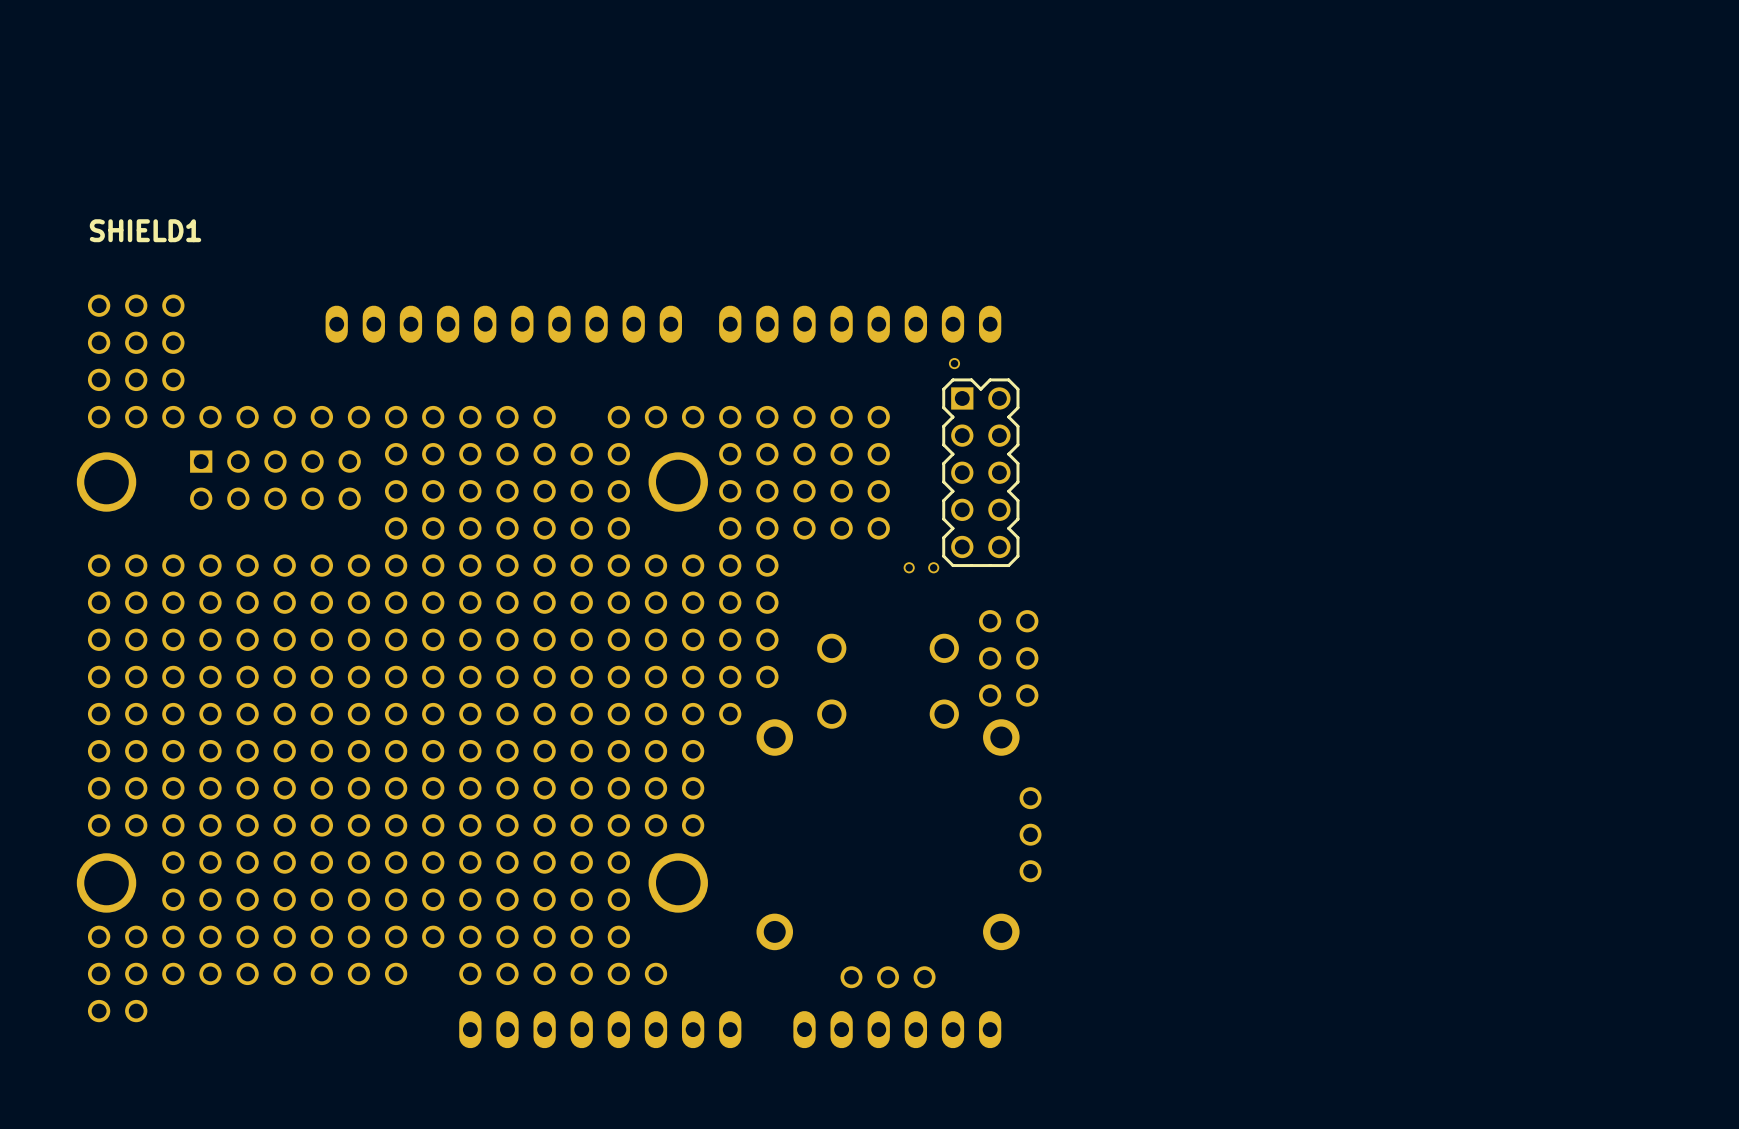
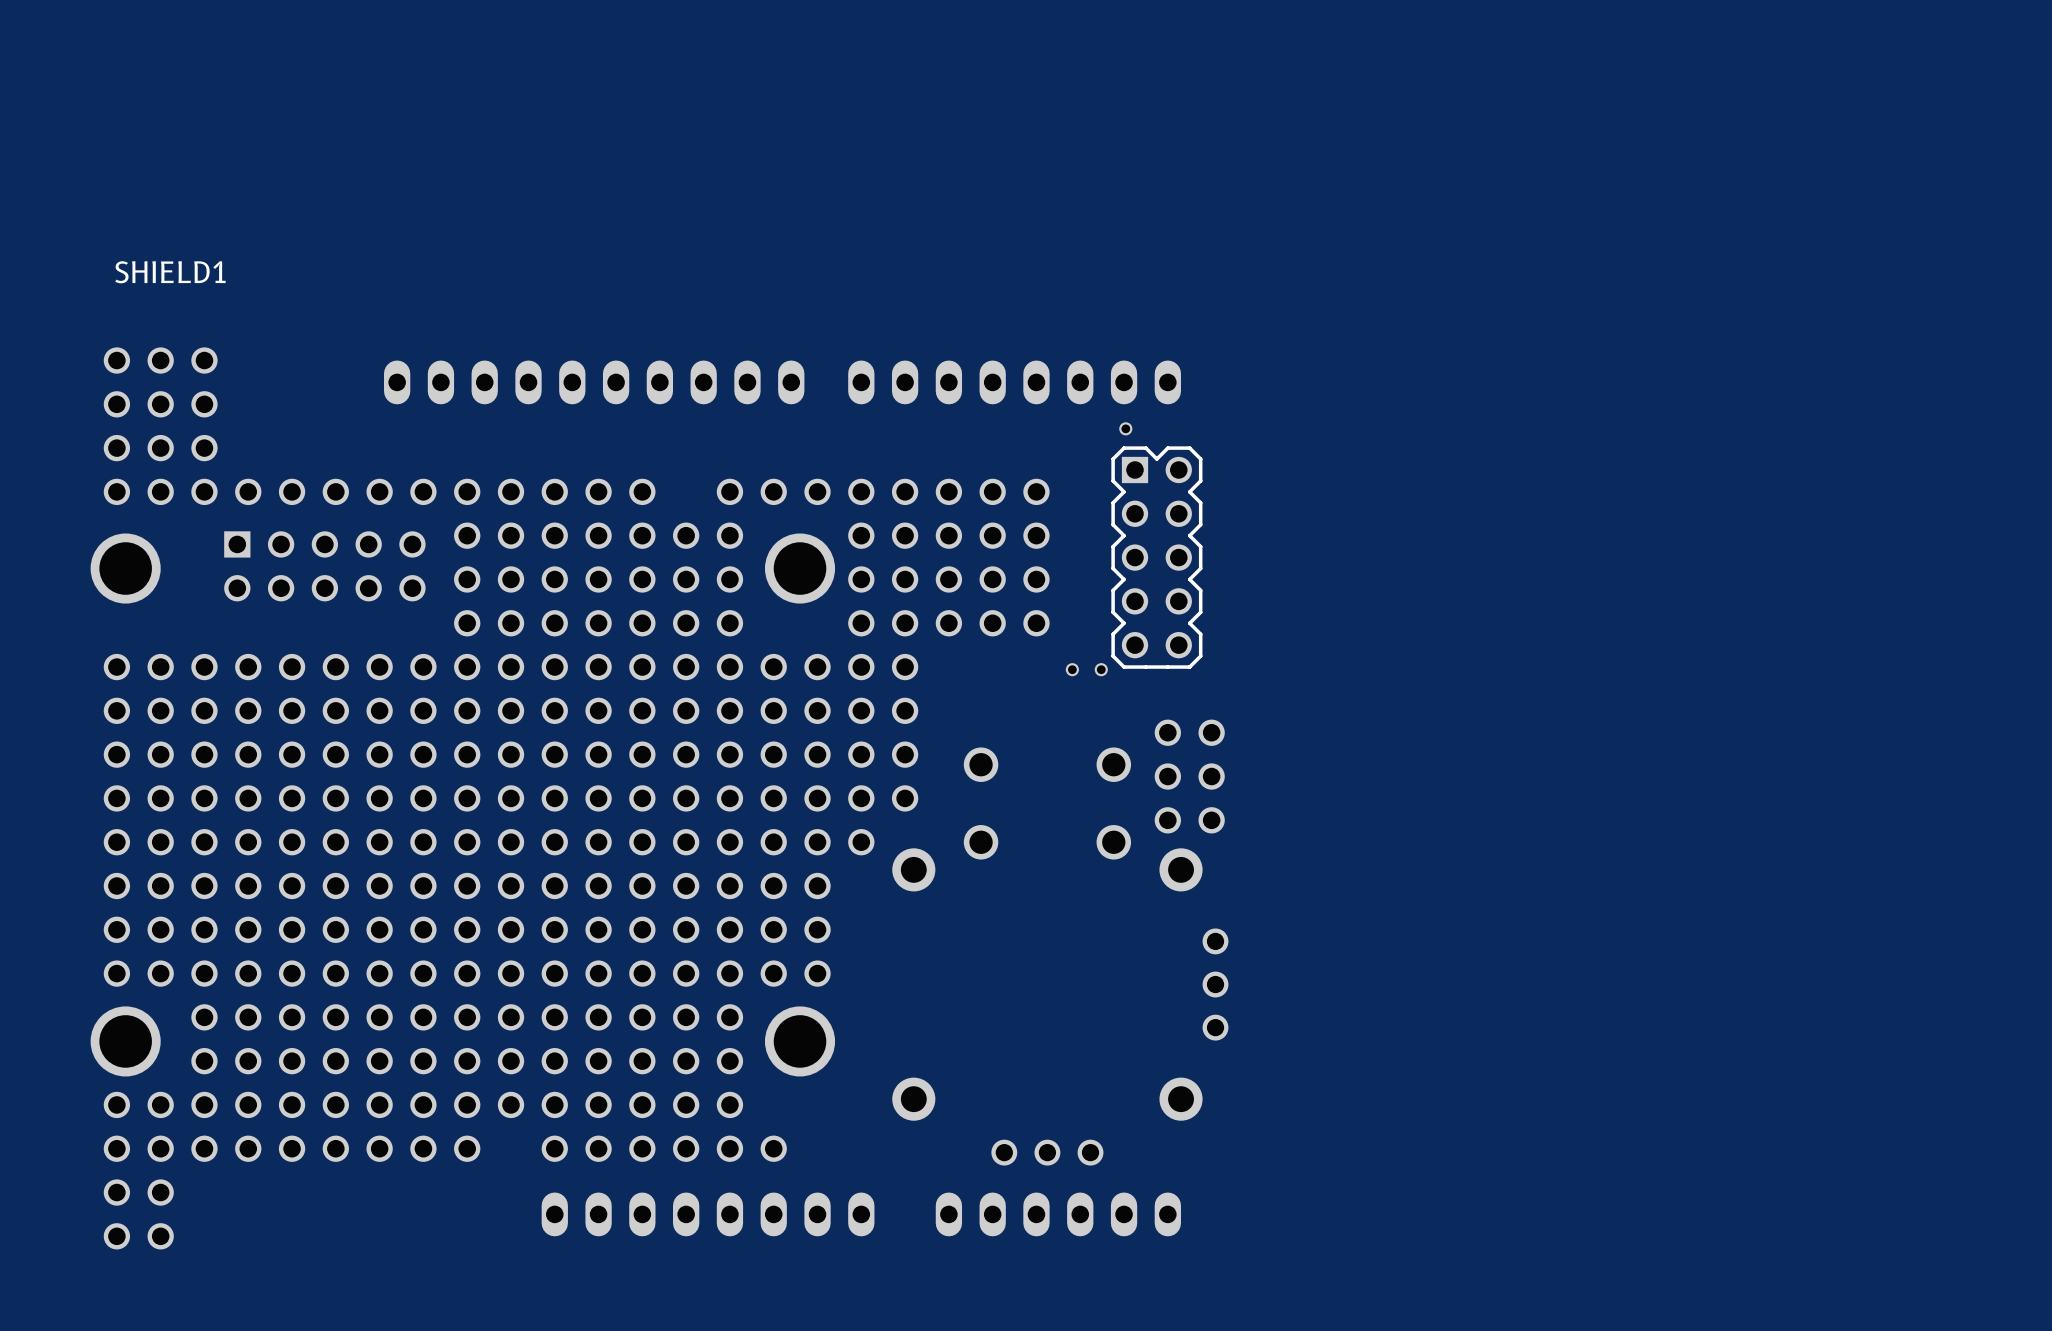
part: none -> (116, 1236)
part: none -> (160, 1236)

